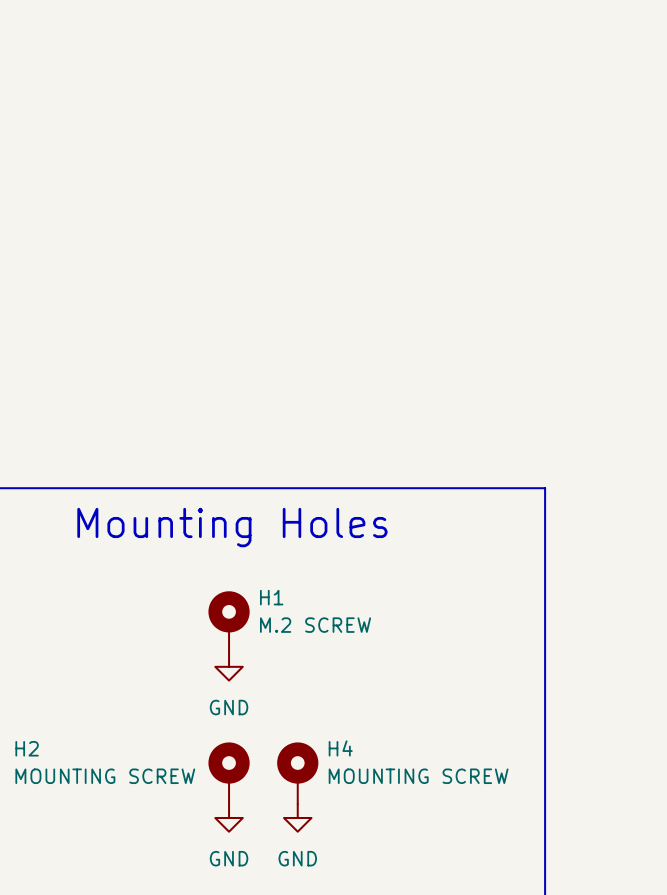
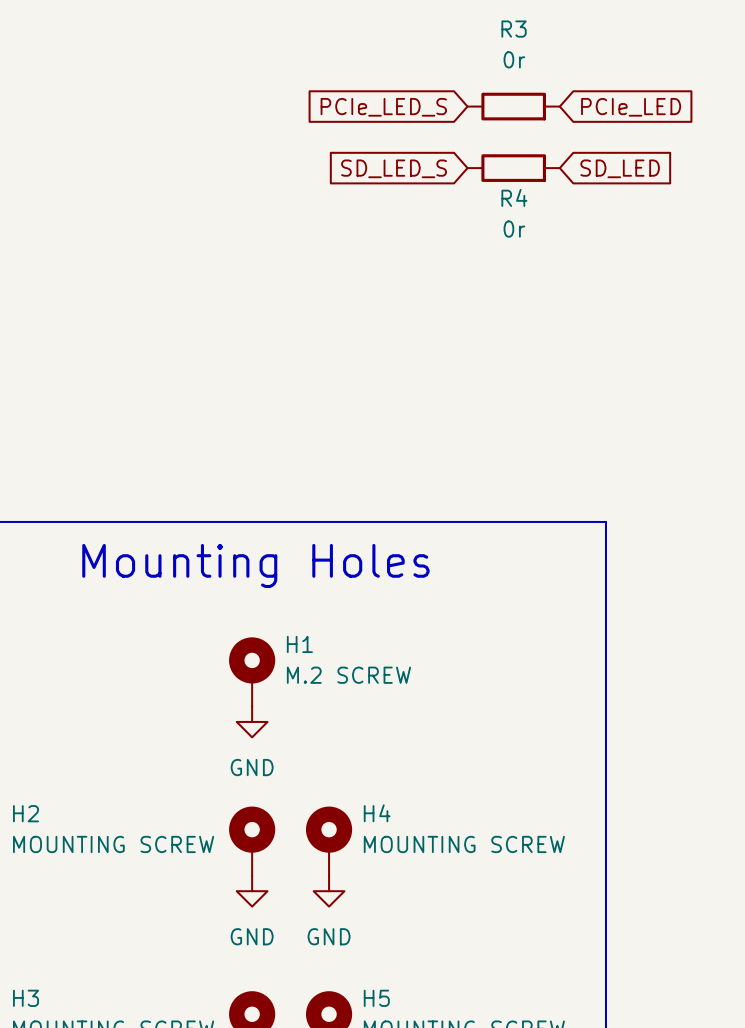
global label: none -> PCIe_LED_S (383, 107)
R3: none -> 0r (513, 106)
global label: none -> PCIe_LED (631, 107)
global label: none -> SD_LED_S (394, 168)
R4: none -> 0r (513, 168)
global label: none -> SD_LED (620, 168)

